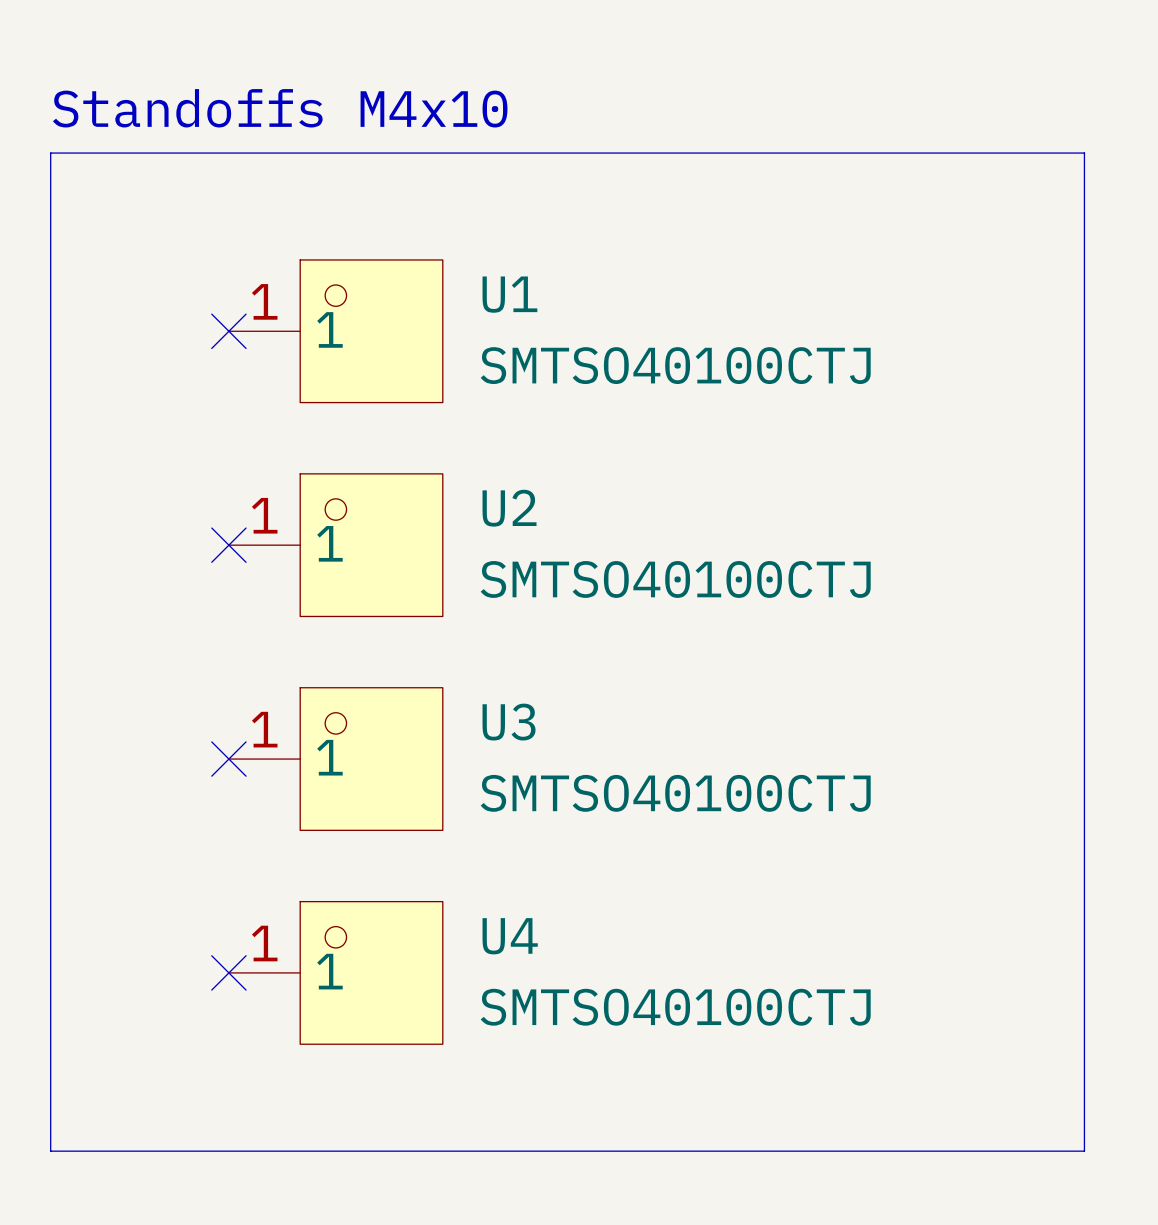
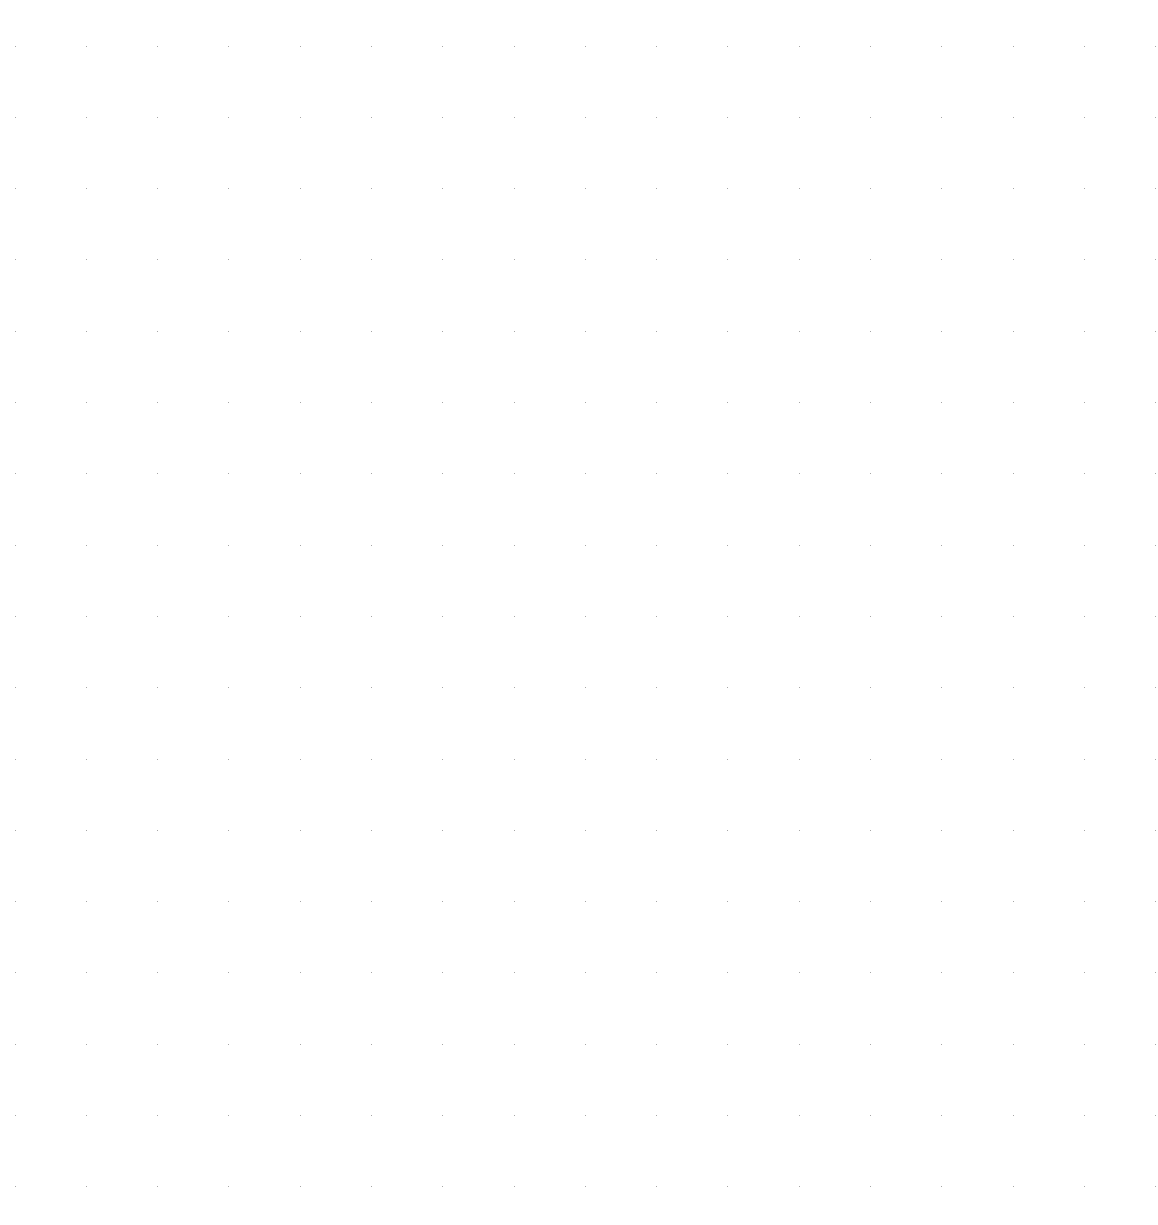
text: Standoffs M4x10 (280, 108) -> none
line: (50, 153) (1084, 153) (1084, 1151) (50, 1151) (50, 153) -> none
no-connect mark: (228, 331) -> none
U1: SMTSO40100CTJ (335, 331) -> none
no-connect mark: (228, 545) -> none
U2: SMTSO40100CTJ (335, 545) -> none
no-connect mark: (228, 759) -> none
U3: SMTSO40100CTJ (335, 759) -> none
no-connect mark: (228, 972) -> none
U4: SMTSO40100CTJ (335, 972) -> none

